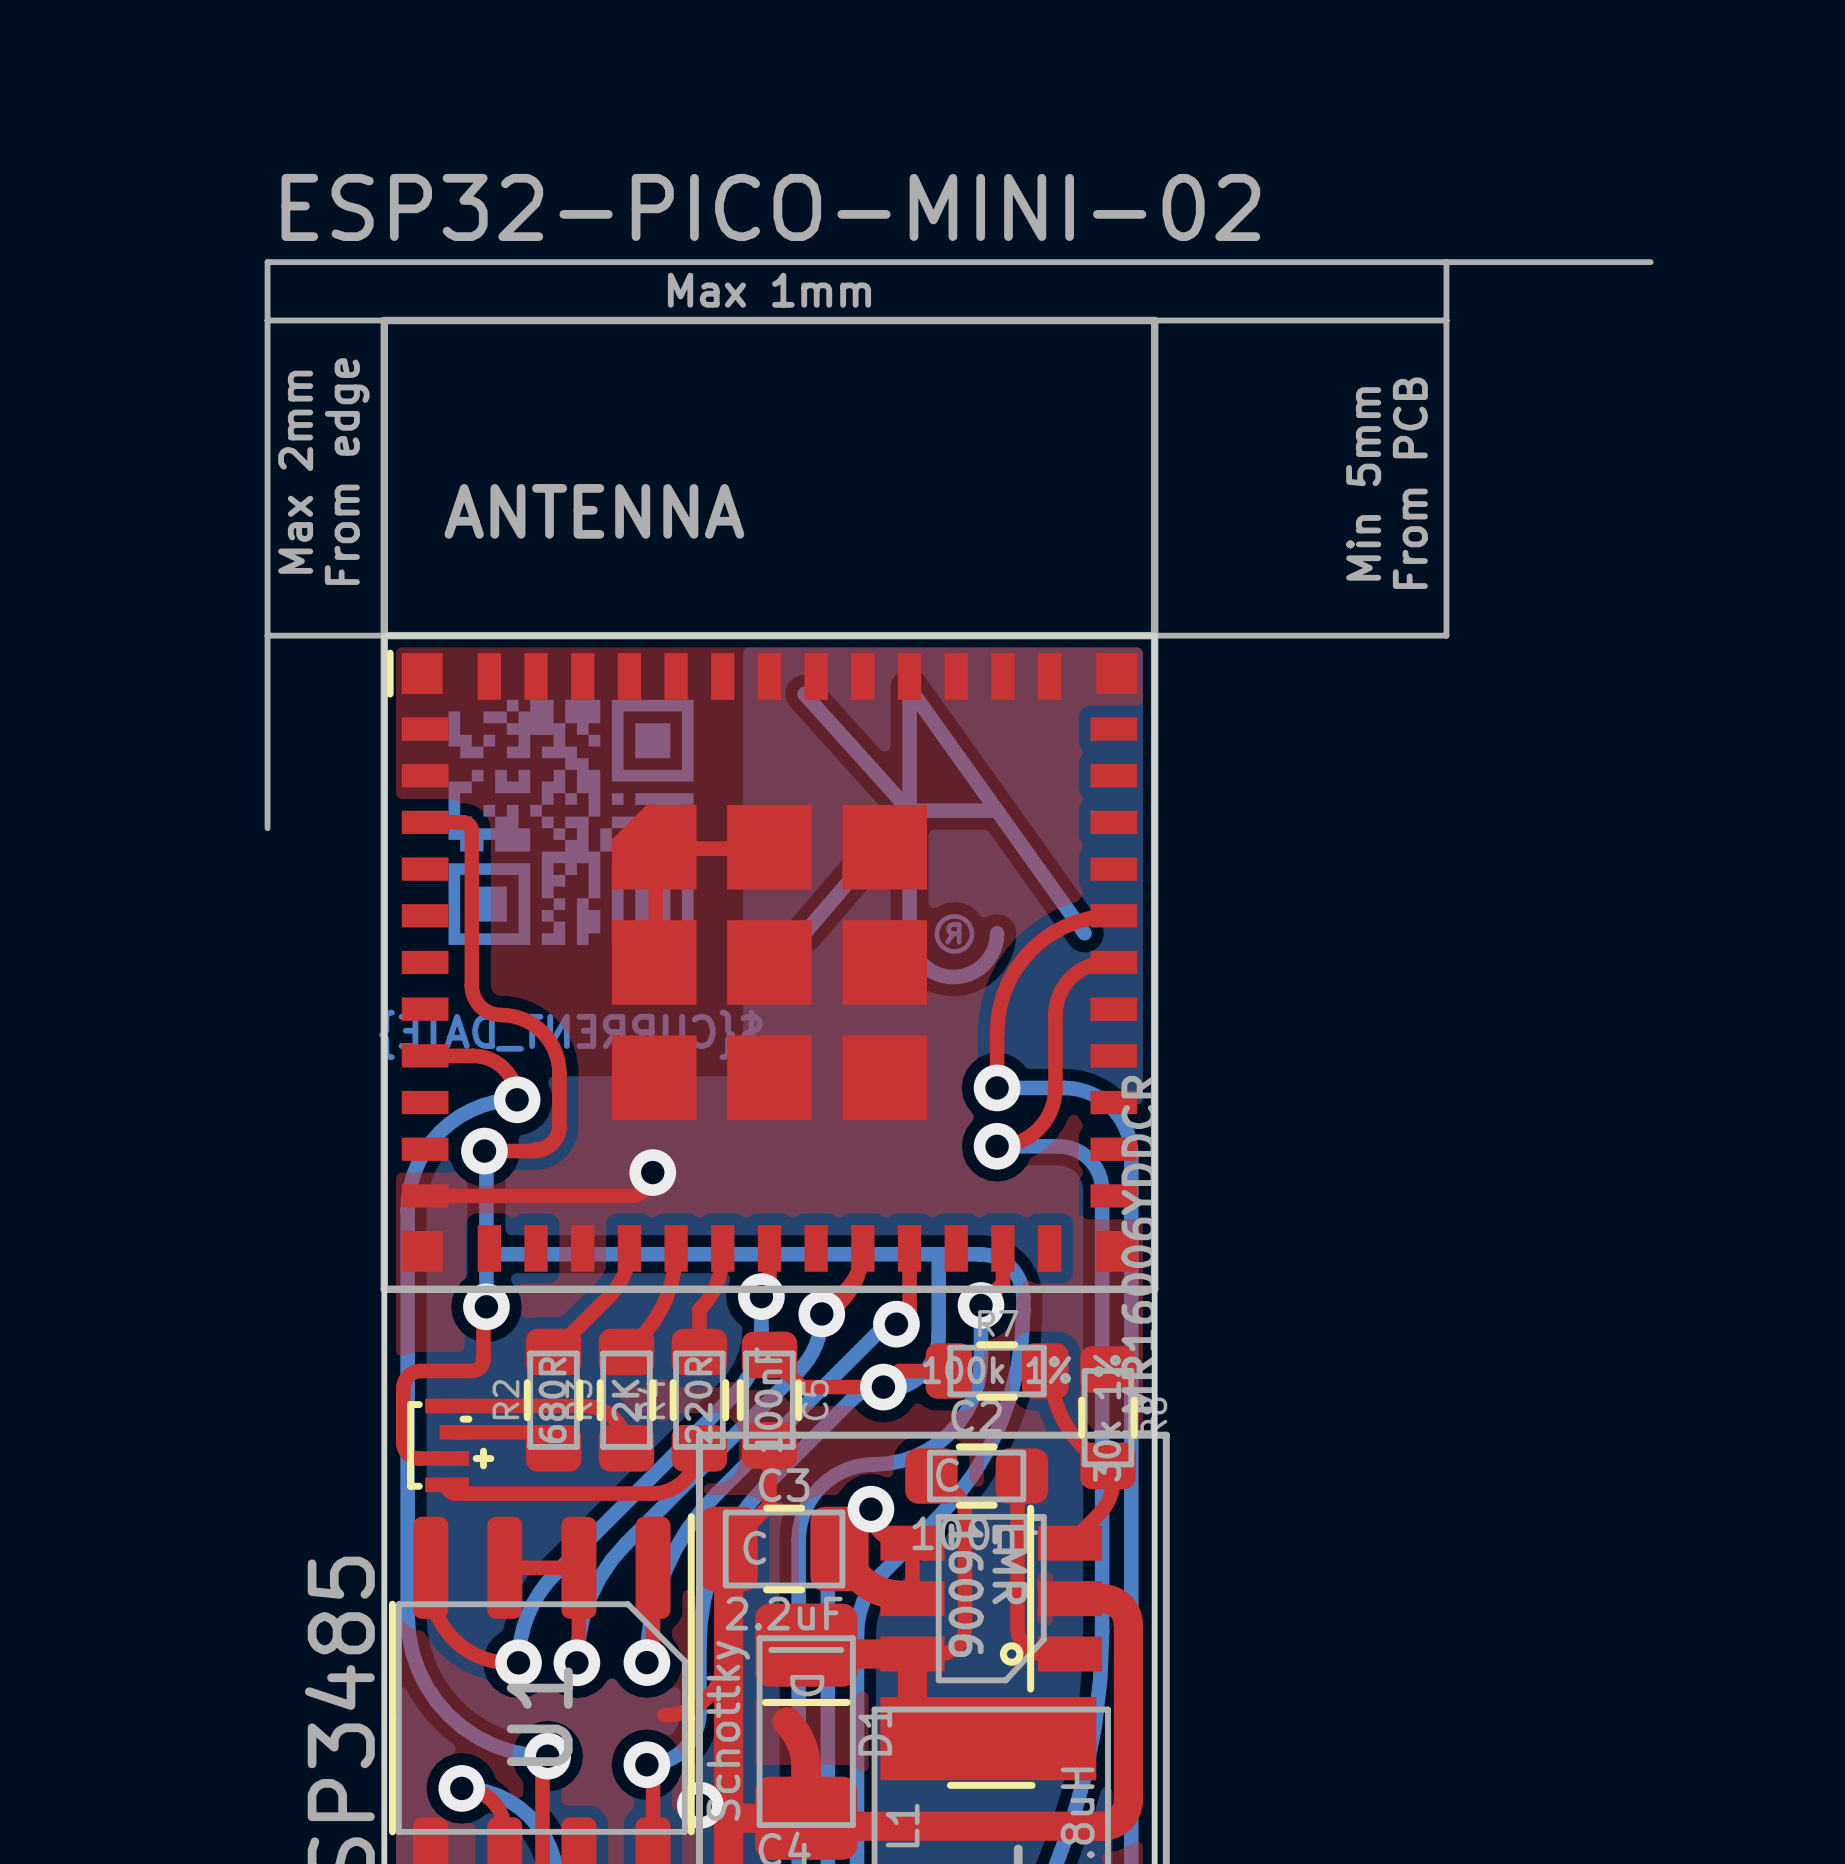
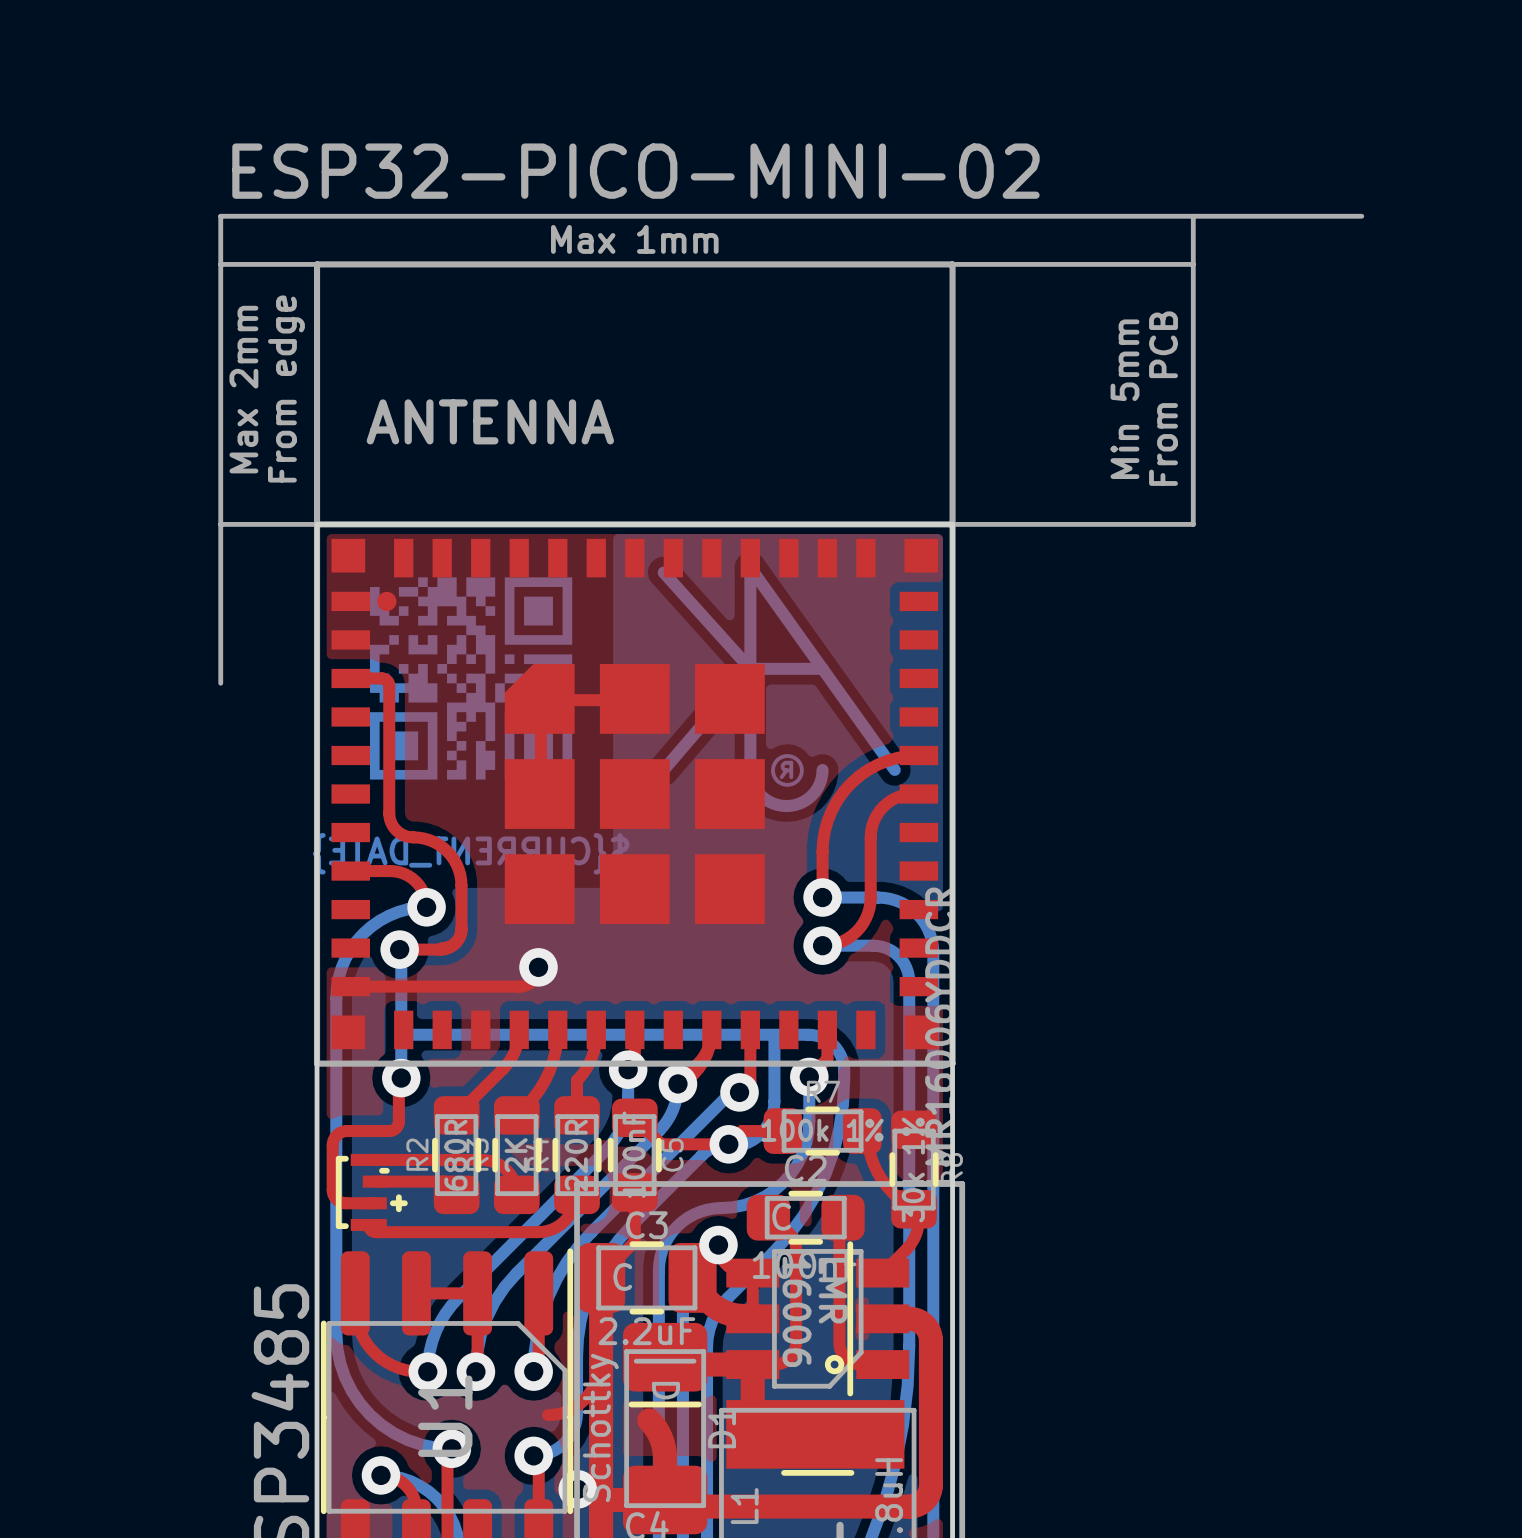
part footprint: [264, 259, 1654, 1294] -> [218, 213, 1365, 1067]

